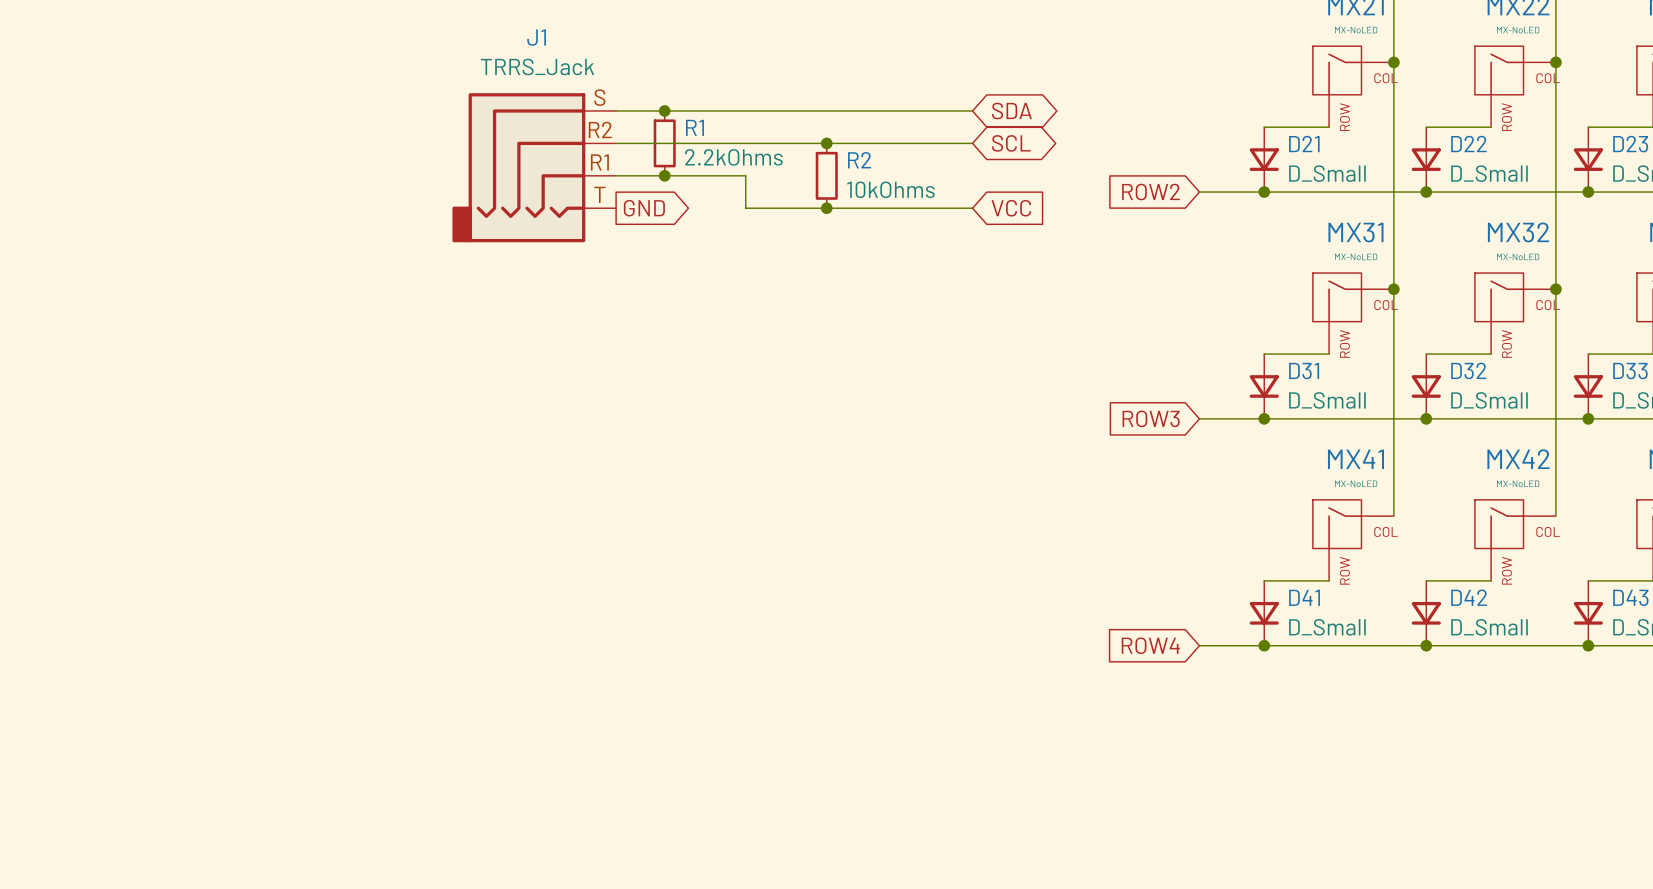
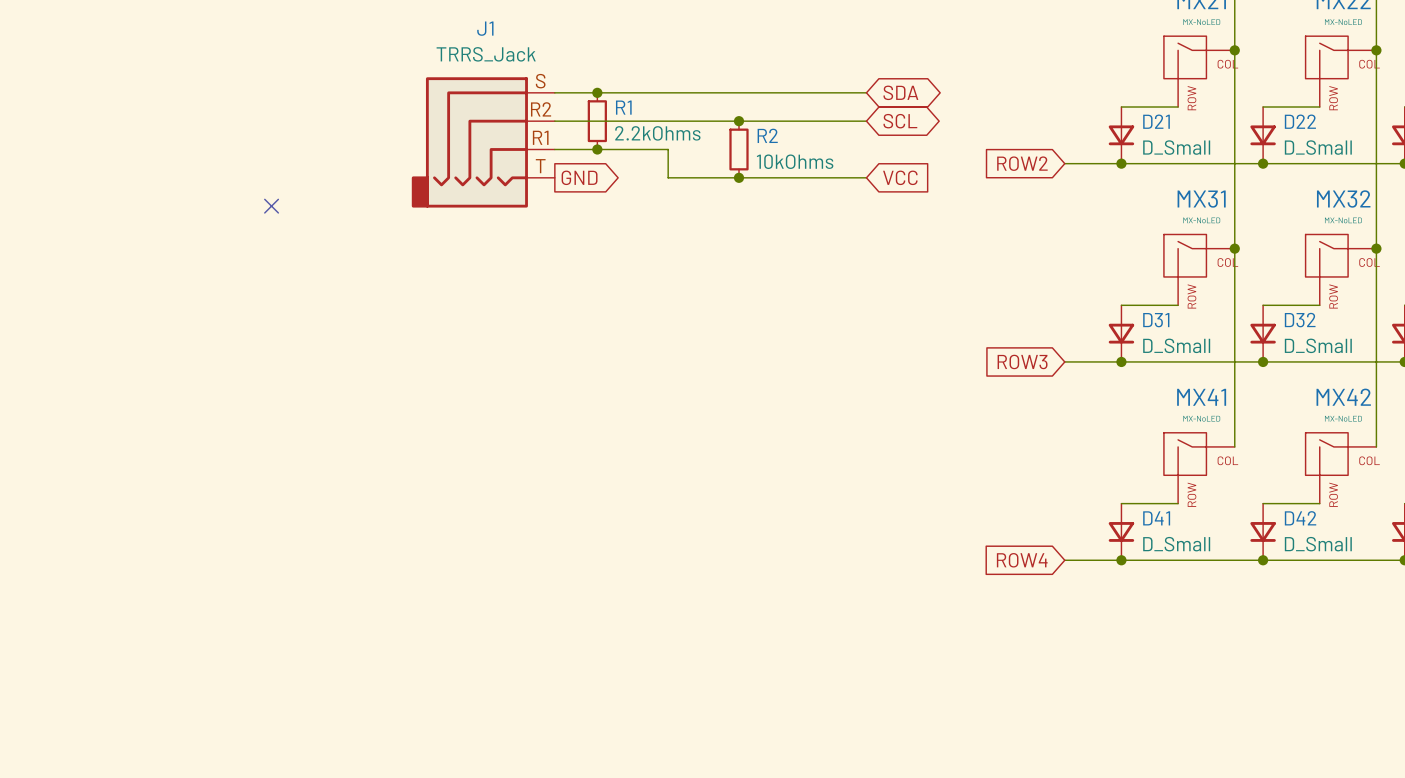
no-connect mark: none -> (271, 206)

